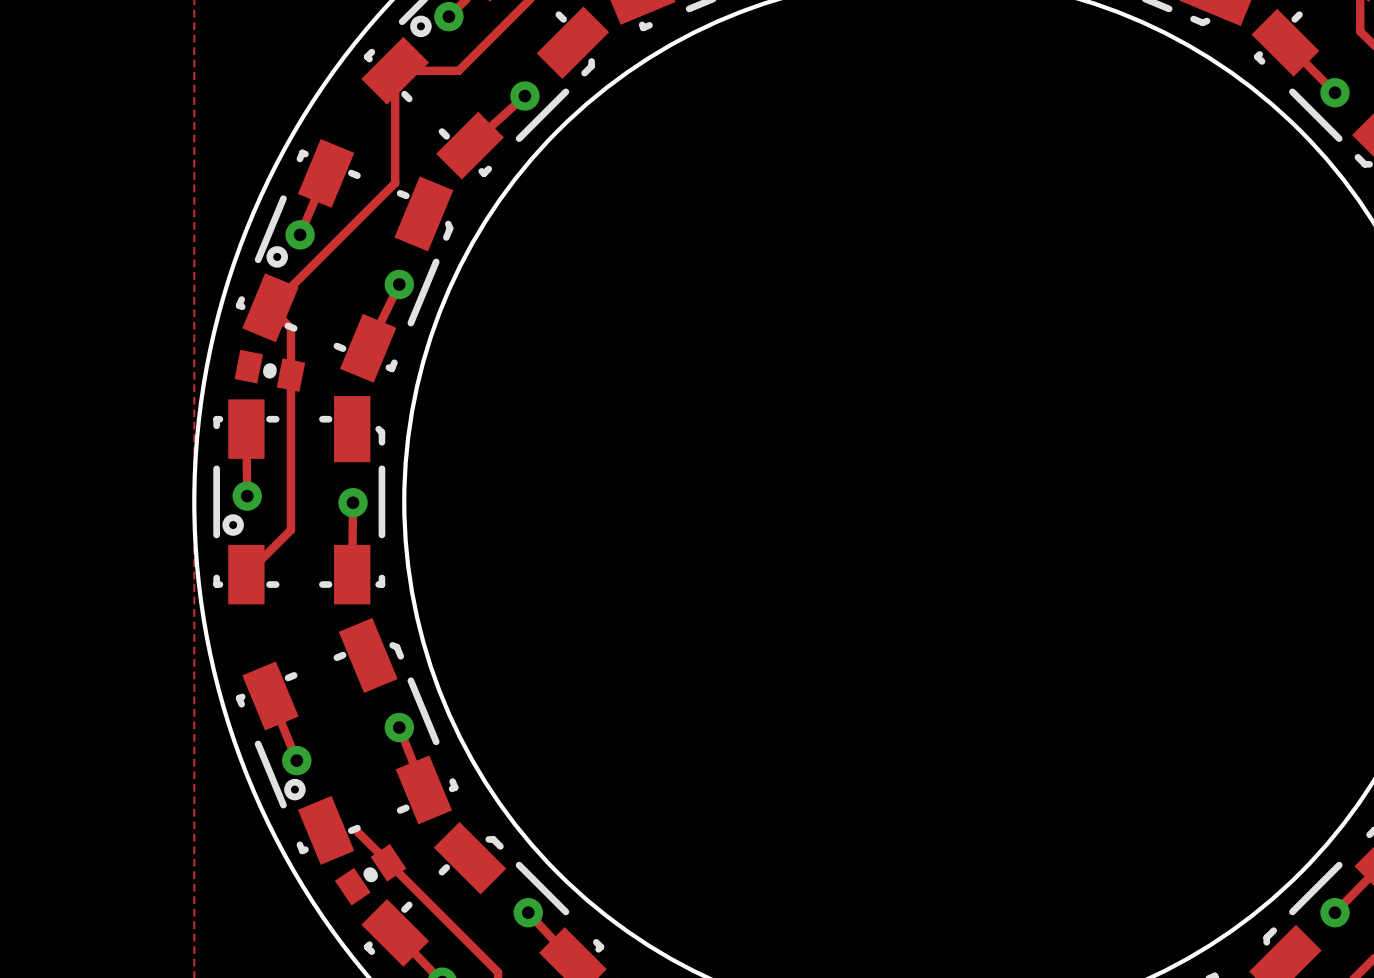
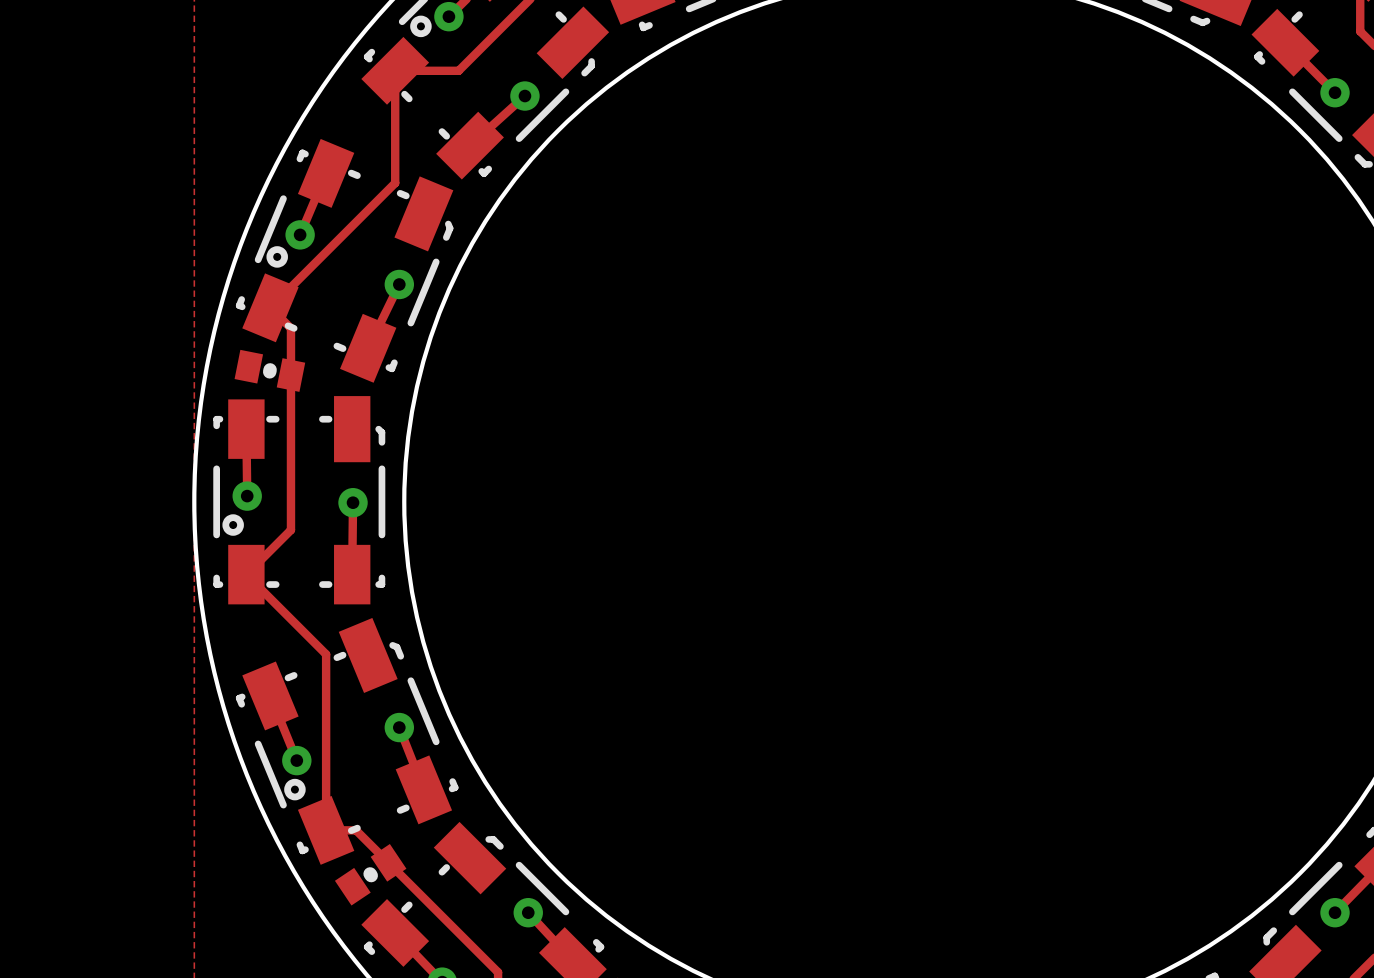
track: none -> (246, 574) (326, 654) (326, 830) (356, 830)

